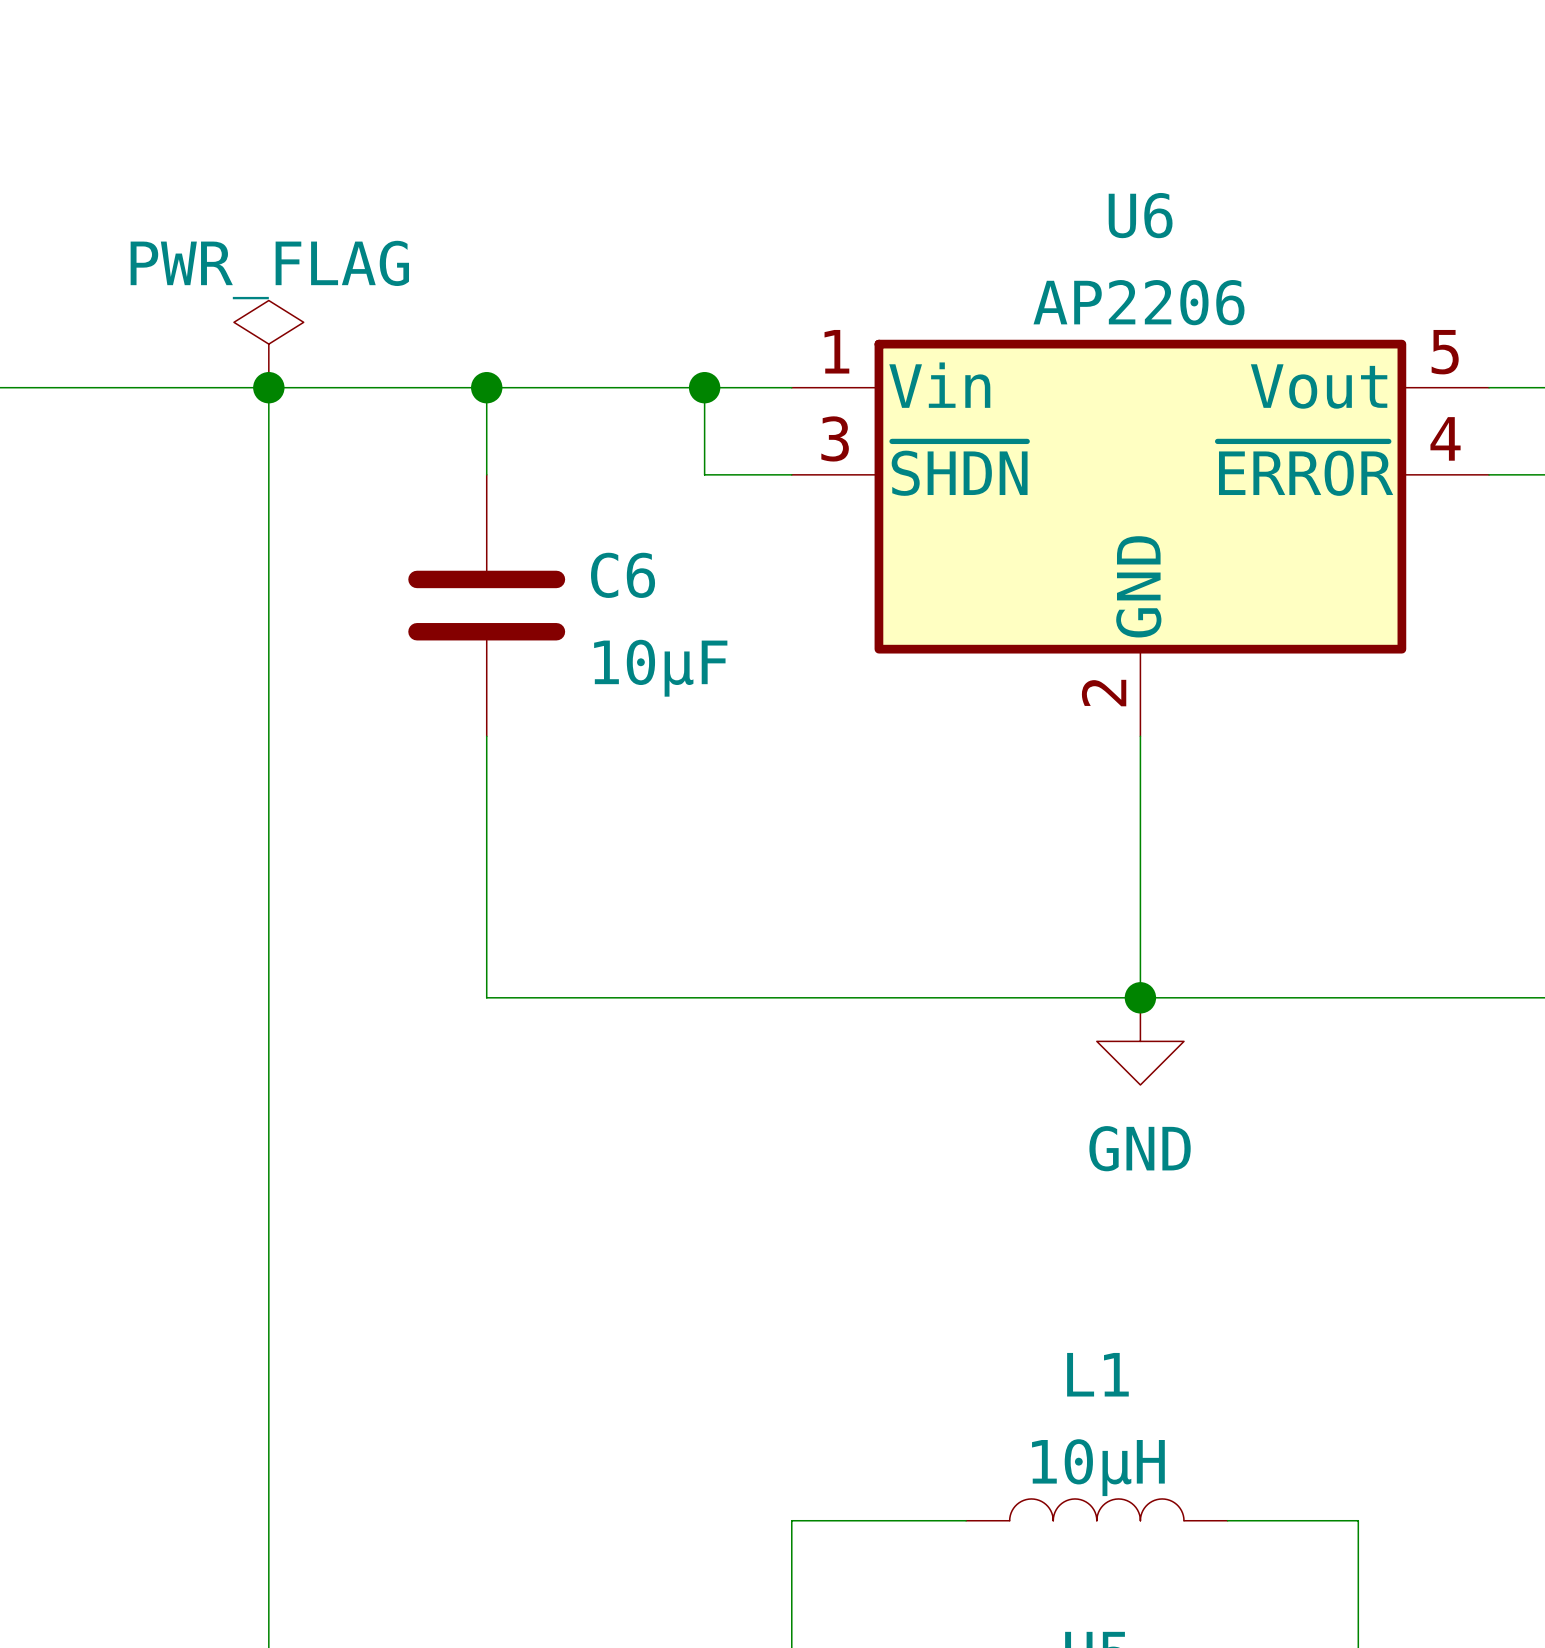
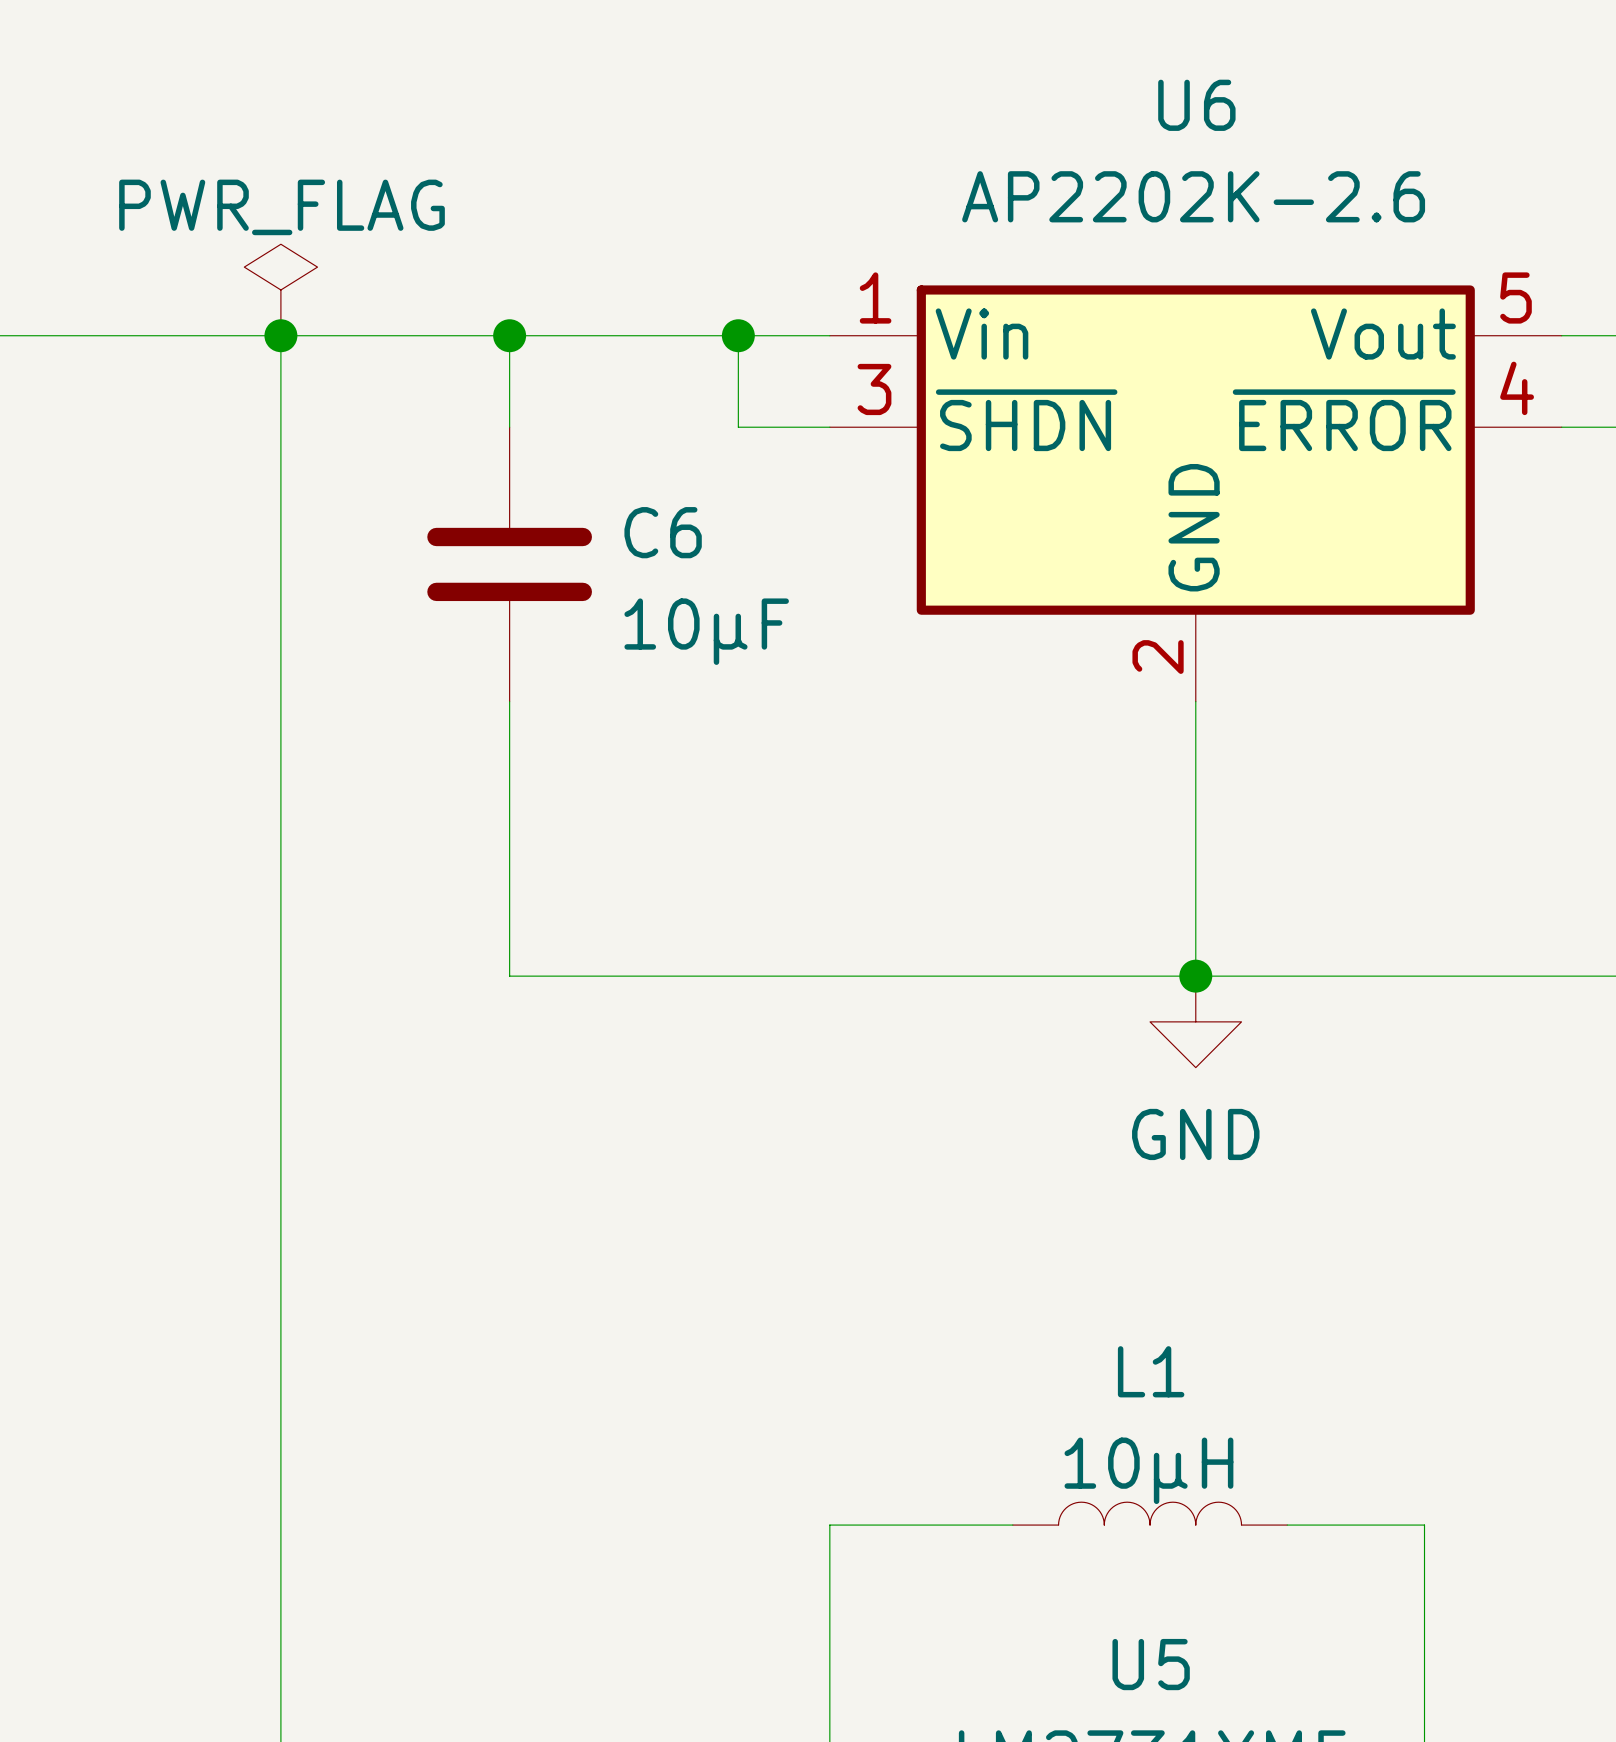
U6 name position: U6 (1140, 215) -> U6 (1196, 105)
U6 value: AP2206 (1139, 302) -> AP2202K-2.6 (1193, 196)

